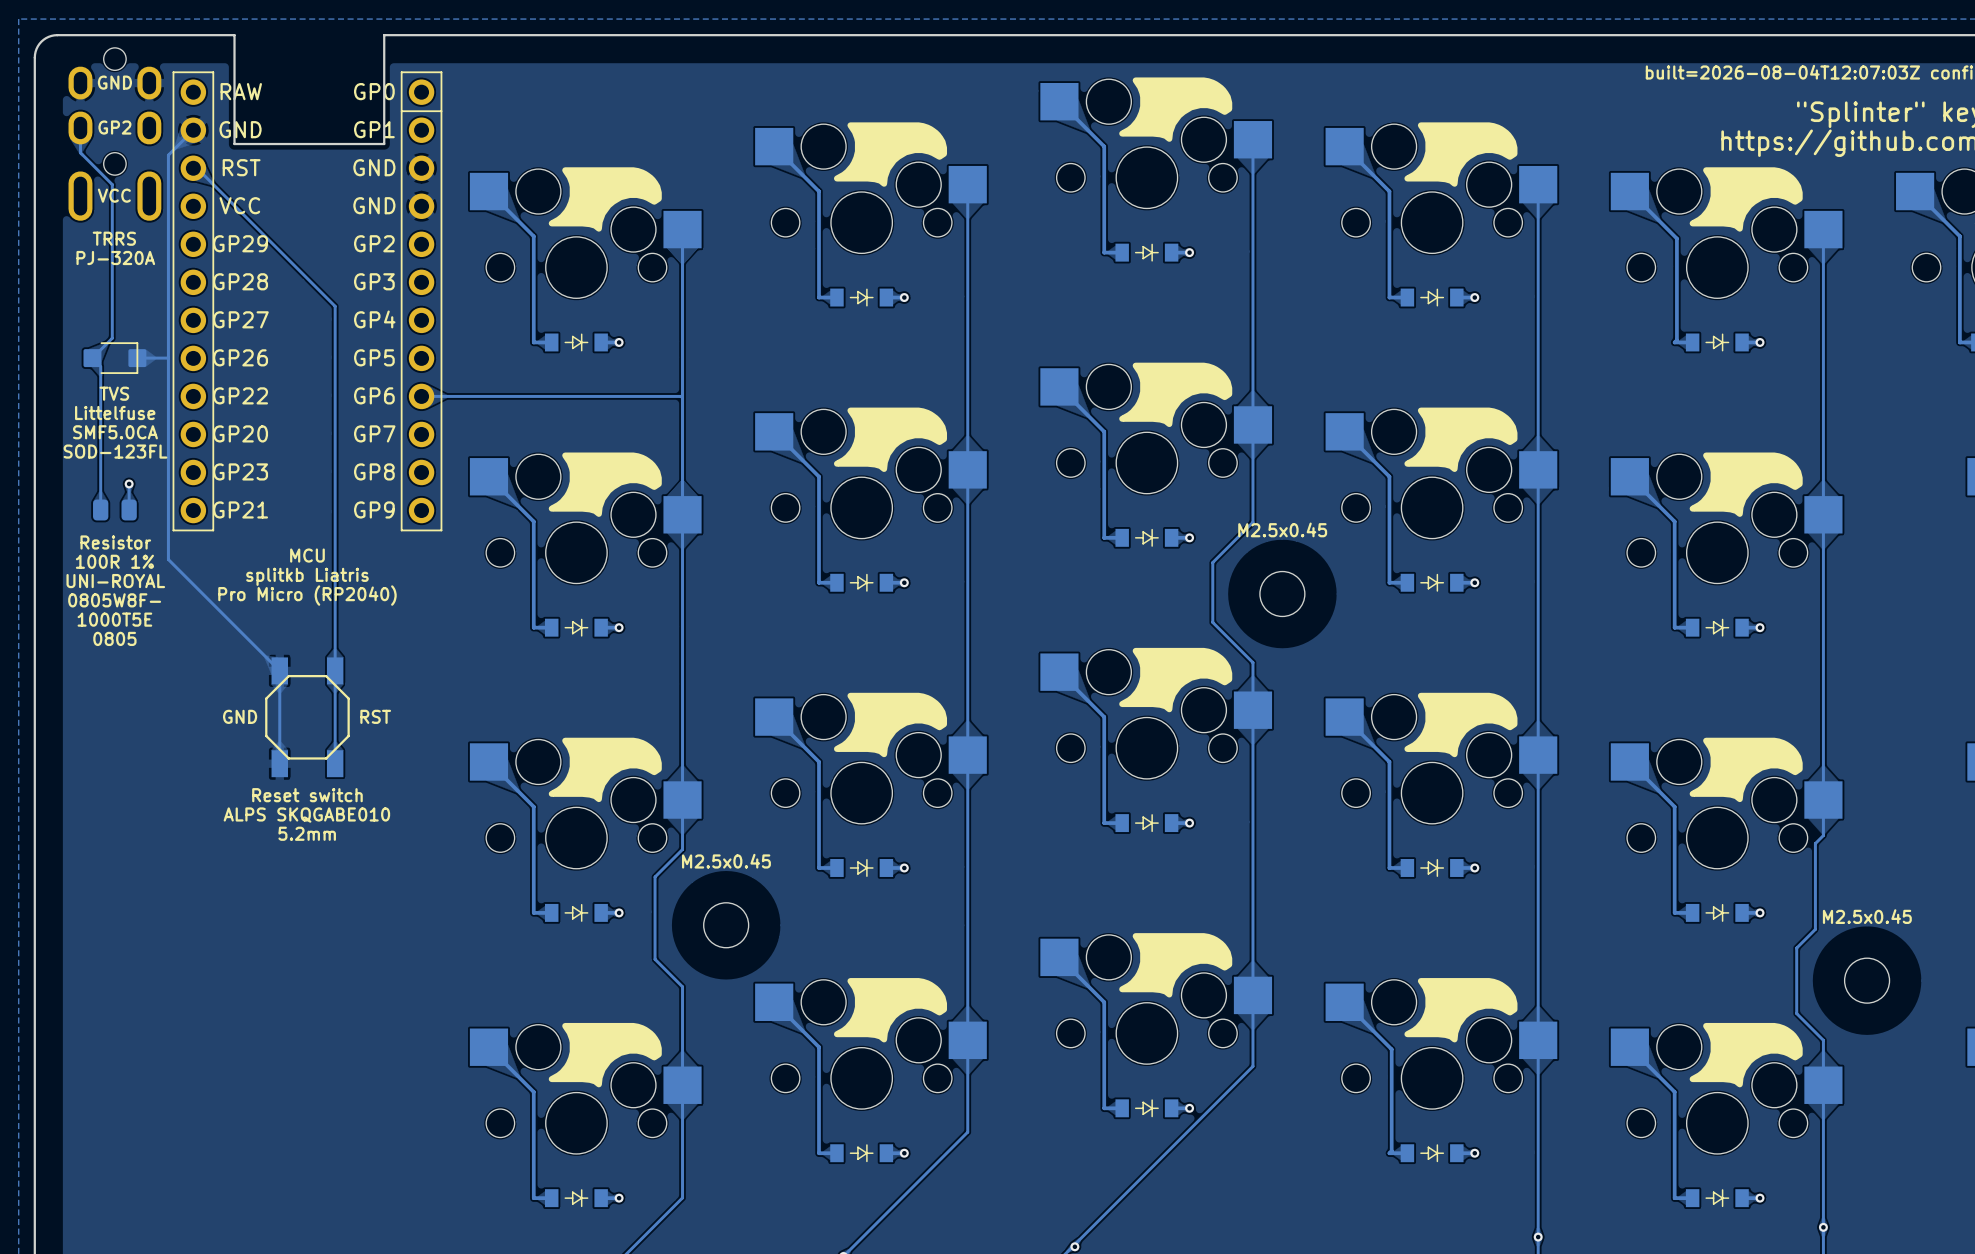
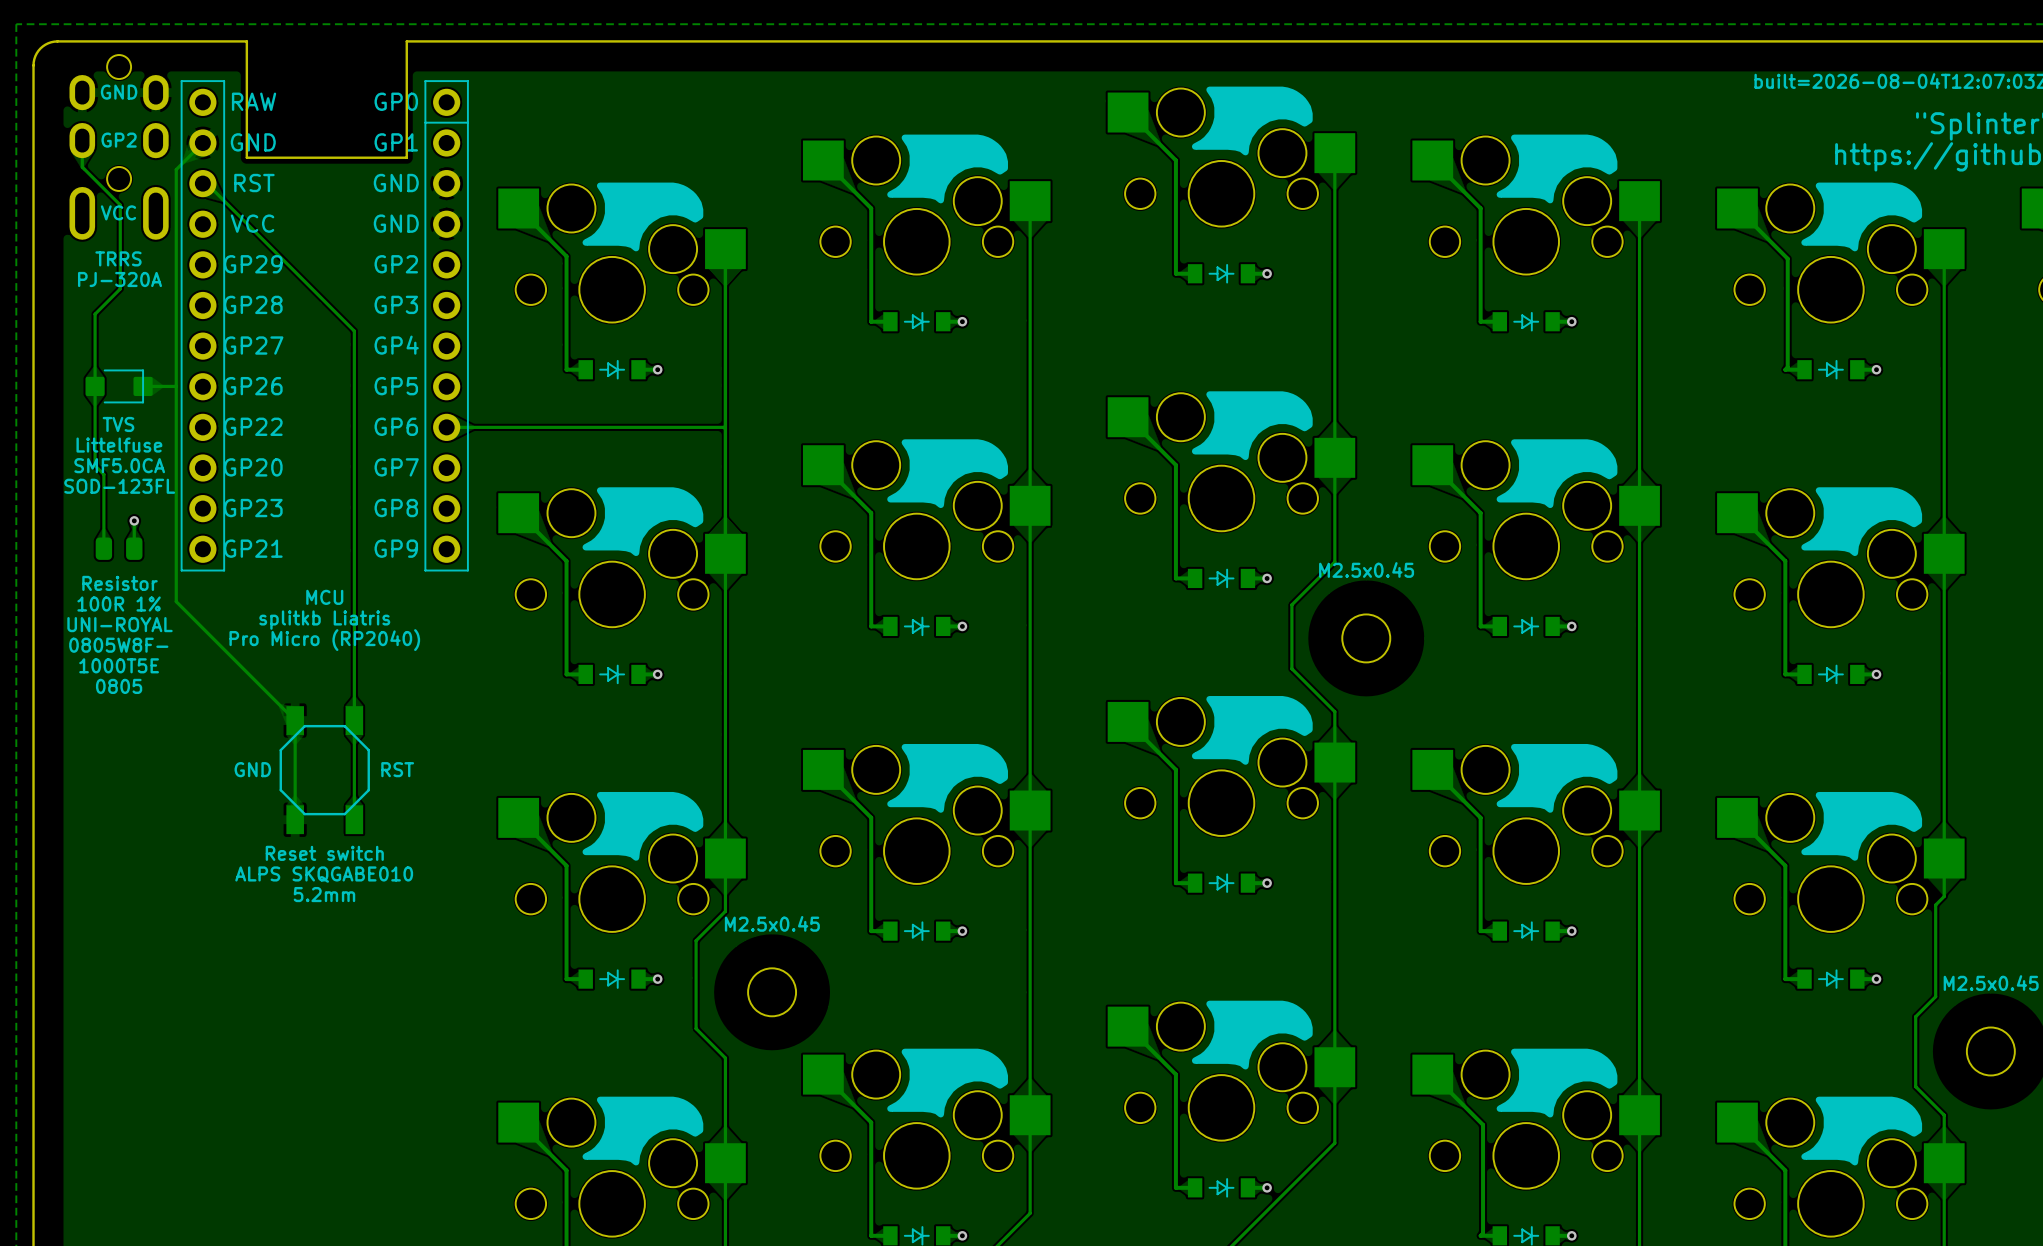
track: (112, 184) (112, 338) (92, 358) -> (116, 201) (120, 205) (120, 288) (95, 314) (95, 465) (103, 474)
track: (100, 366) (100, 440) -> none

